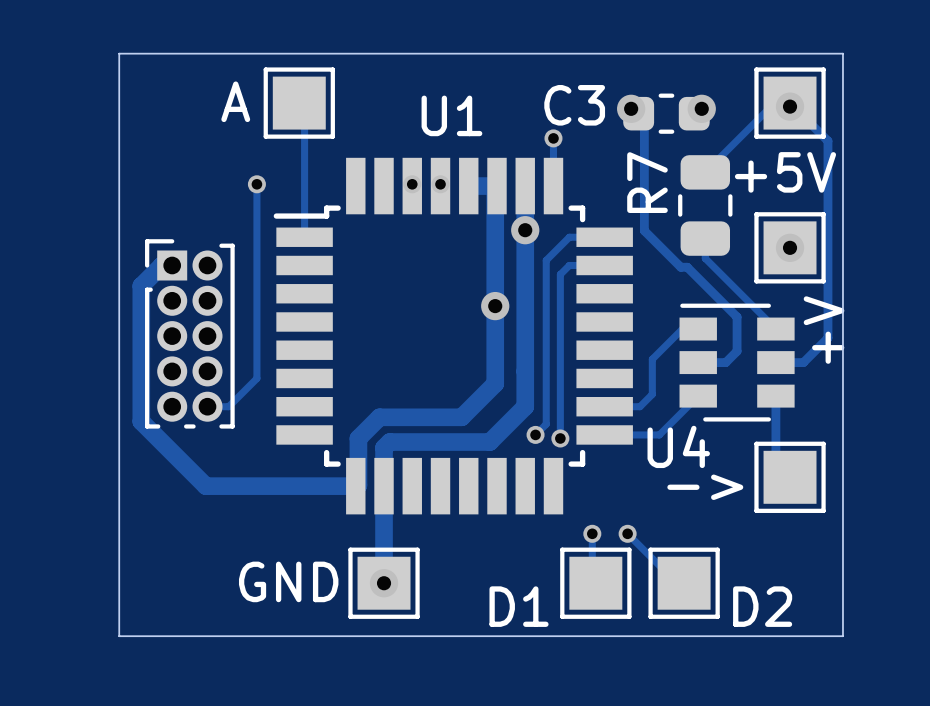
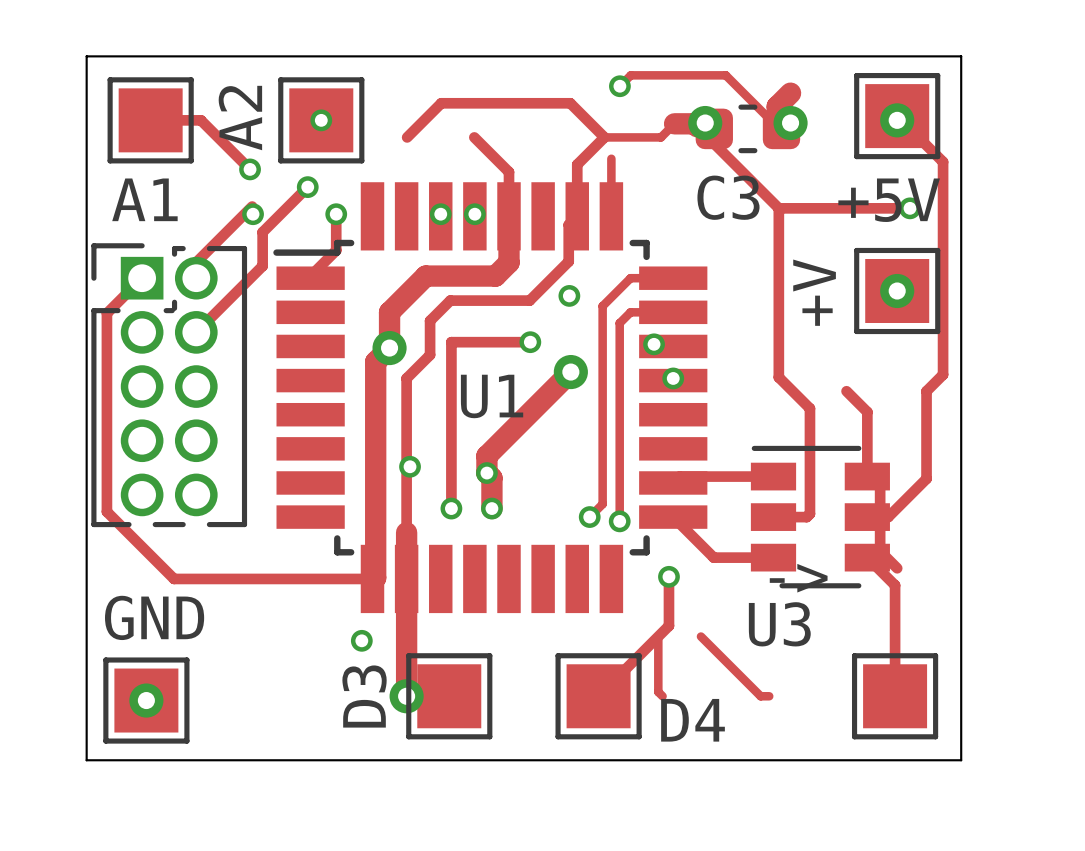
track: none -> (619, 86) (630, 75) (725, 75) (777, 126) (777, 106) (790, 93)
via: none -> (619, 86)
text: A (235, 101) -> A2 (240, 118)
track: (299, 103) (304, 108) (304, 235) -> none
part position: (299, 103) -> (321, 120)
C3 name position: C3 (574, 105) -> C3 (728, 197)
track: none -> (150, 120) (200, 120) (250, 169)
part: none -> (150, 120)
via: none -> (321, 120)
track: (771, 106) (705, 172) -> none
track: (631, 108) (644, 122) (644, 230) (680, 267) (687, 267) (737, 317) (737, 351) (725, 362) (698, 362) -> none
U1 name position: U1 (451, 115) -> U1 (492, 396)
track: none -> (407, 137) (441, 103) (570, 103) (604, 137)
track: none -> (604, 137) (660, 137) (674, 123) (694, 123) (778, 208)
via: (553, 138) -> none
via: none -> (250, 169)
track: none -> (307, 187) (262, 232) (262, 266) (196, 332)
via: none -> (307, 187)
text: none -> A1 (144, 199)
track: none -> (252, 206) (196, 262) (196, 278)
track: none -> (778, 208) (910, 208)
track: none -> (778, 208) (778, 377) (809, 408) (809, 513) (806, 517) (773, 517)
via: none -> (910, 208)
track: (256, 184) (256, 378) (228, 406) (207, 406) -> none
track: none -> (336, 214) (336, 250) (310, 278)
via: none -> (336, 214)
track: (468, 186) (496, 186) (495, 187) (495, 383) (461, 417) (379, 417) (358, 438) -> (474, 137) (509, 172) (509, 262) (495, 276) (425, 276) (389, 312) (389, 348) (375, 361) (375, 521)
track: (525, 186) (525, 406) (489, 442) (389, 442) (384, 447) -> (604, 137) (577, 164) (577, 216) (568, 224) (568, 261) (529, 300) (450, 300) (430, 320) (430, 354) (406, 378) (406, 532)
R7: (705, 205) -> none
via position: (525, 230) -> (569, 295)
track: (705, 238) (705, 258) (775, 329) -> none
part footprint: [145, 239, 235, 429] -> [91, 243, 248, 528]
track: (172, 265) (161, 265) (141, 285) (141, 421) (205, 486) -> (142, 278) (106, 313) (106, 511) (174, 578) (191, 578)
track: none -> (530, 342) (451, 342) (451, 508)
via: none -> (530, 342)
via: none -> (654, 344)
via: none -> (389, 348)
via position: (495, 306) -> (570, 372)
track: none -> (570, 372) (486, 455) (486, 473) (491, 478) (491, 508)
track: (827, 317) (827, 338) (803, 362) (775, 362) -> (943, 374) (926, 391) (926, 478) (888, 517) (867, 517)
via: none -> (673, 378)
track: (698, 329) (682, 329) (652, 359) (652, 394) (639, 406) (604, 406) -> (773, 476) (679, 476) (673, 482)
track: none -> (846, 391) (867, 412) (867, 476)
text position: +V (824, 330) -> +V (814, 292)
U4: (737, 362) -> none
via: none -> (410, 466)
track: (698, 396) (659, 434) (604, 434) -> (773, 557) (713, 557) (673, 517)
via: none -> (486, 473)
via: none -> (451, 508)
via: none -> (491, 508)
U3: none -> (820, 517)
track: none -> (867, 557) (895, 585) (895, 696)
part: (790, 477) -> none
track: none -> (668, 576) (668, 625) (598, 696)
via: none -> (668, 576)
track width: thick (205, 486) (355, 486) -> thin (191, 578) (372, 578)
via: (592, 533) -> none
via: (627, 533) -> none
via: none -> (361, 640)
text position: GND (288, 581) -> GND (154, 617)
text: none -> D3 (364, 696)
part position: (384, 583) -> (449, 696)
part position: (595, 583) -> (598, 696)
part: (684, 583) -> none
part: none -> (895, 696)
part: none -> (146, 700)
via: none -> (146, 700)
text: none -> D4 (693, 720)
text: D1 (519, 606) -> none
text: D2 (762, 606) -> none

